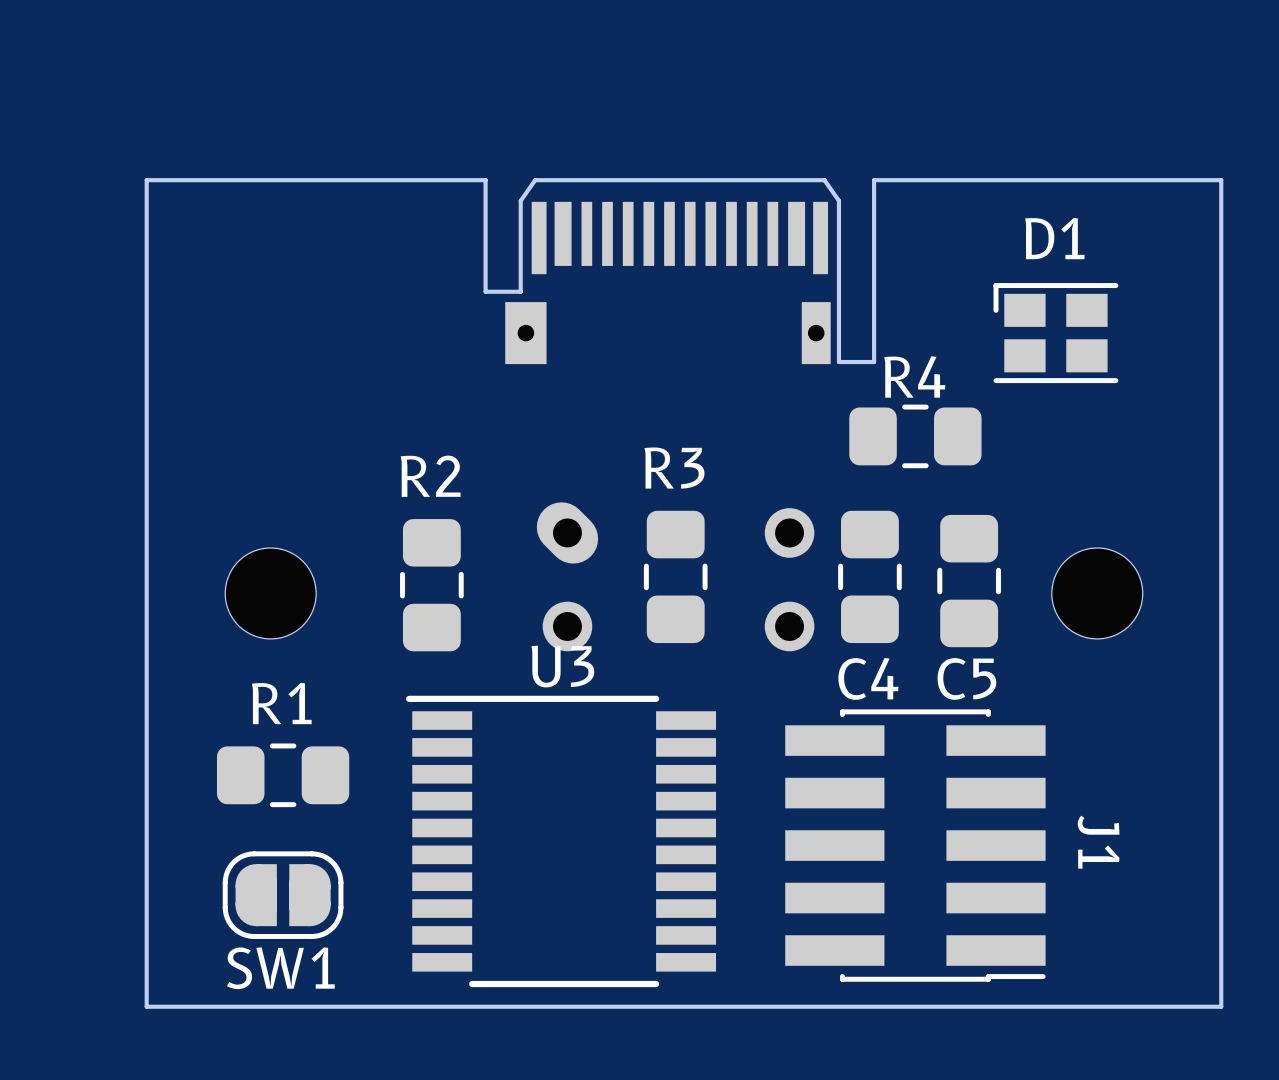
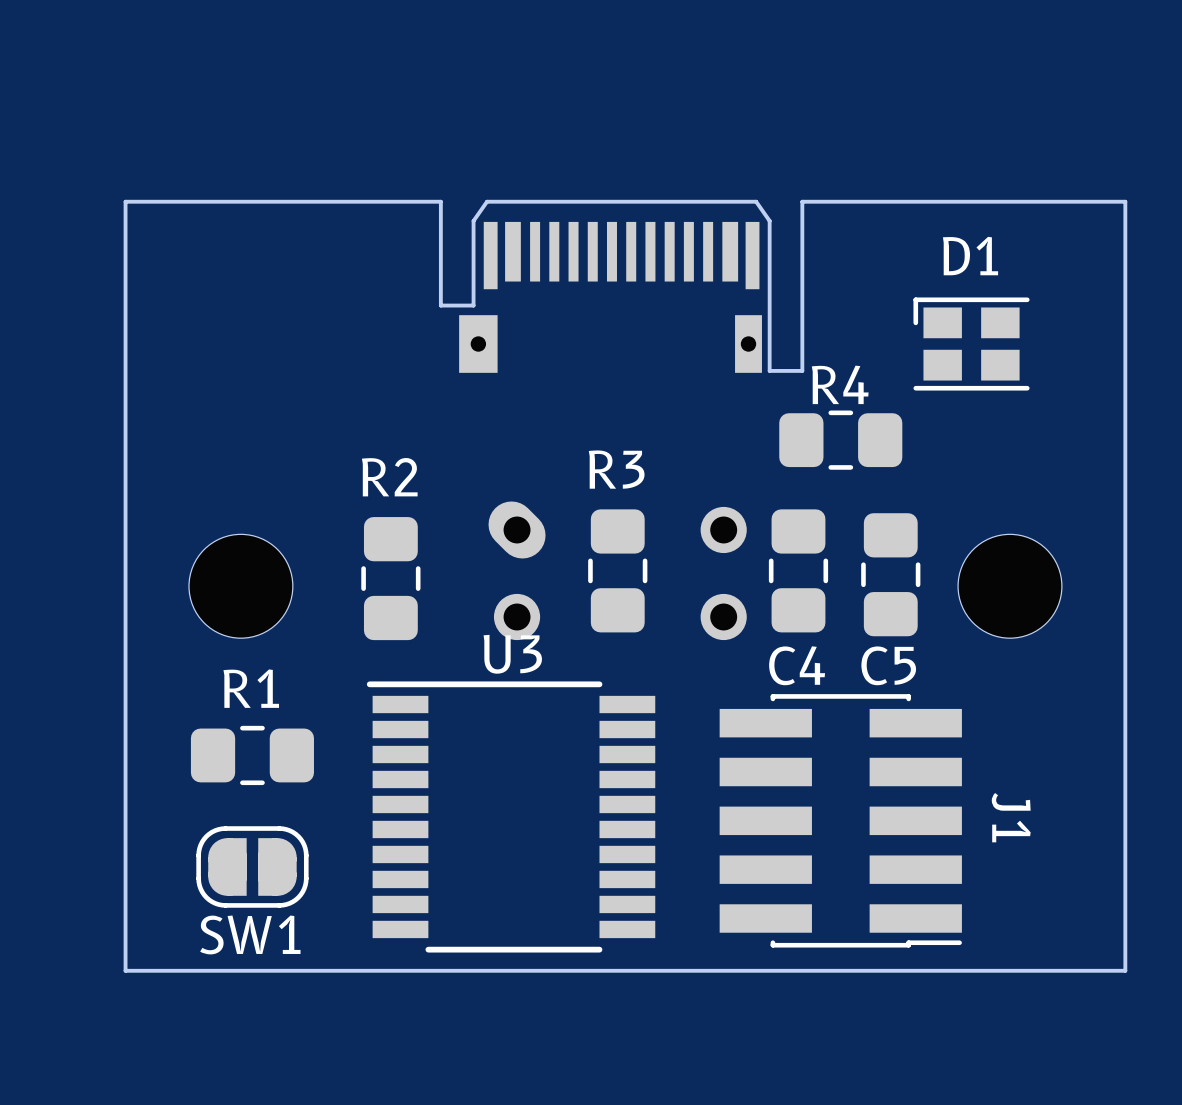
part footprint: [225, 547, 317, 639] -> [189, 534, 293, 639]
part footprint: [1051, 547, 1143, 639] -> [958, 534, 1062, 639]

